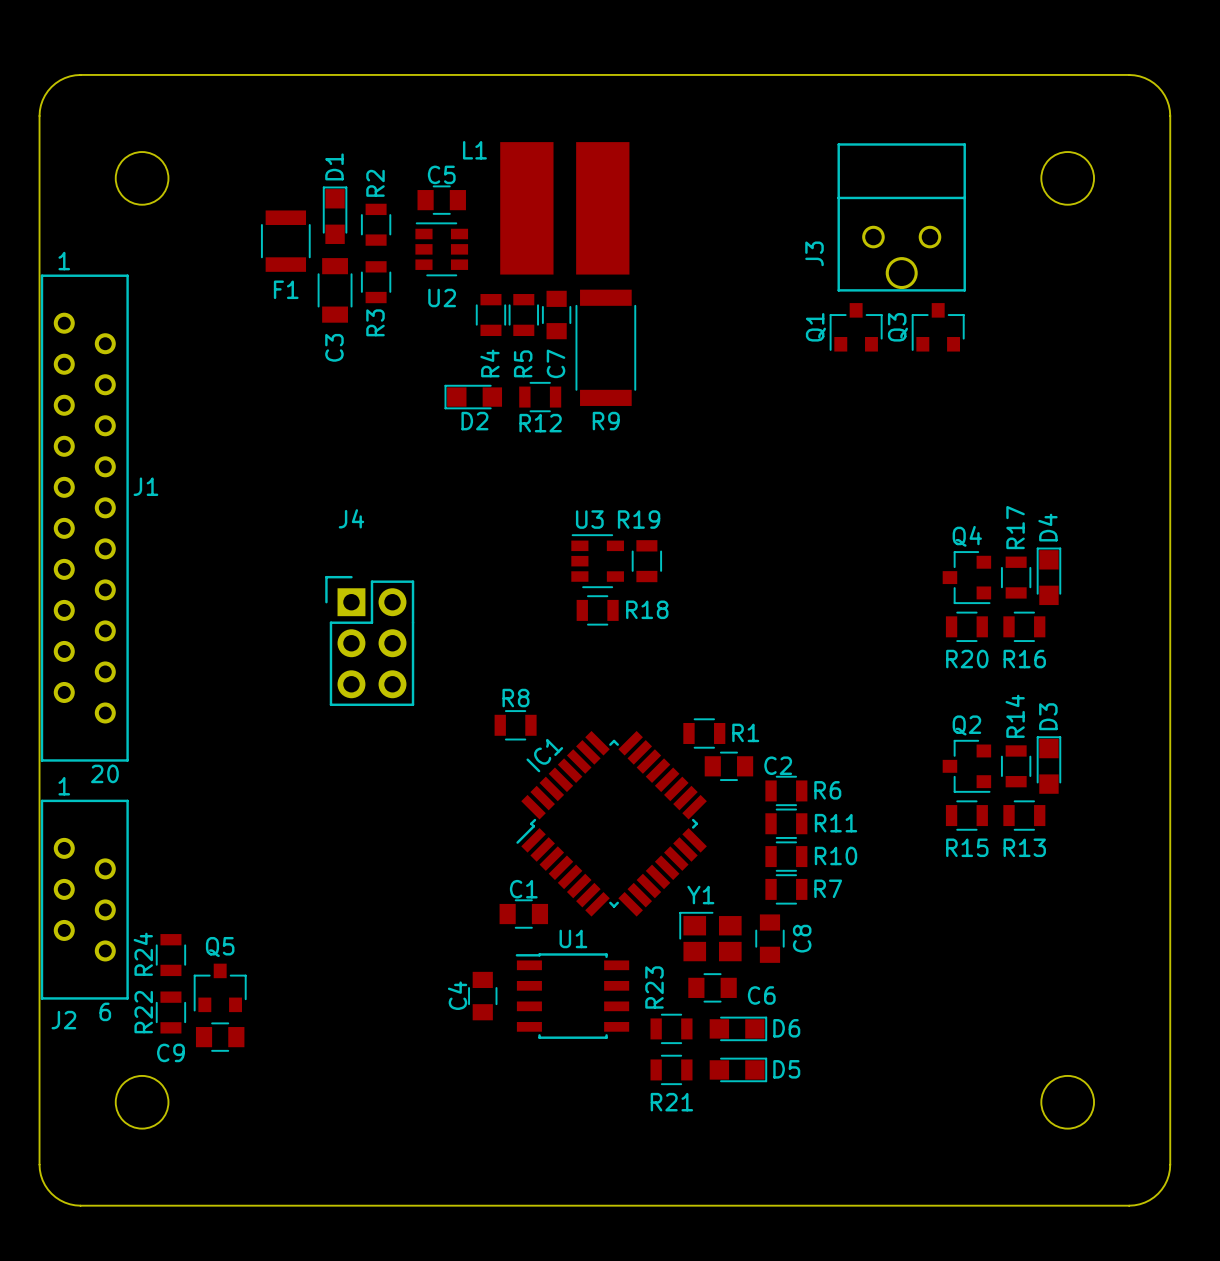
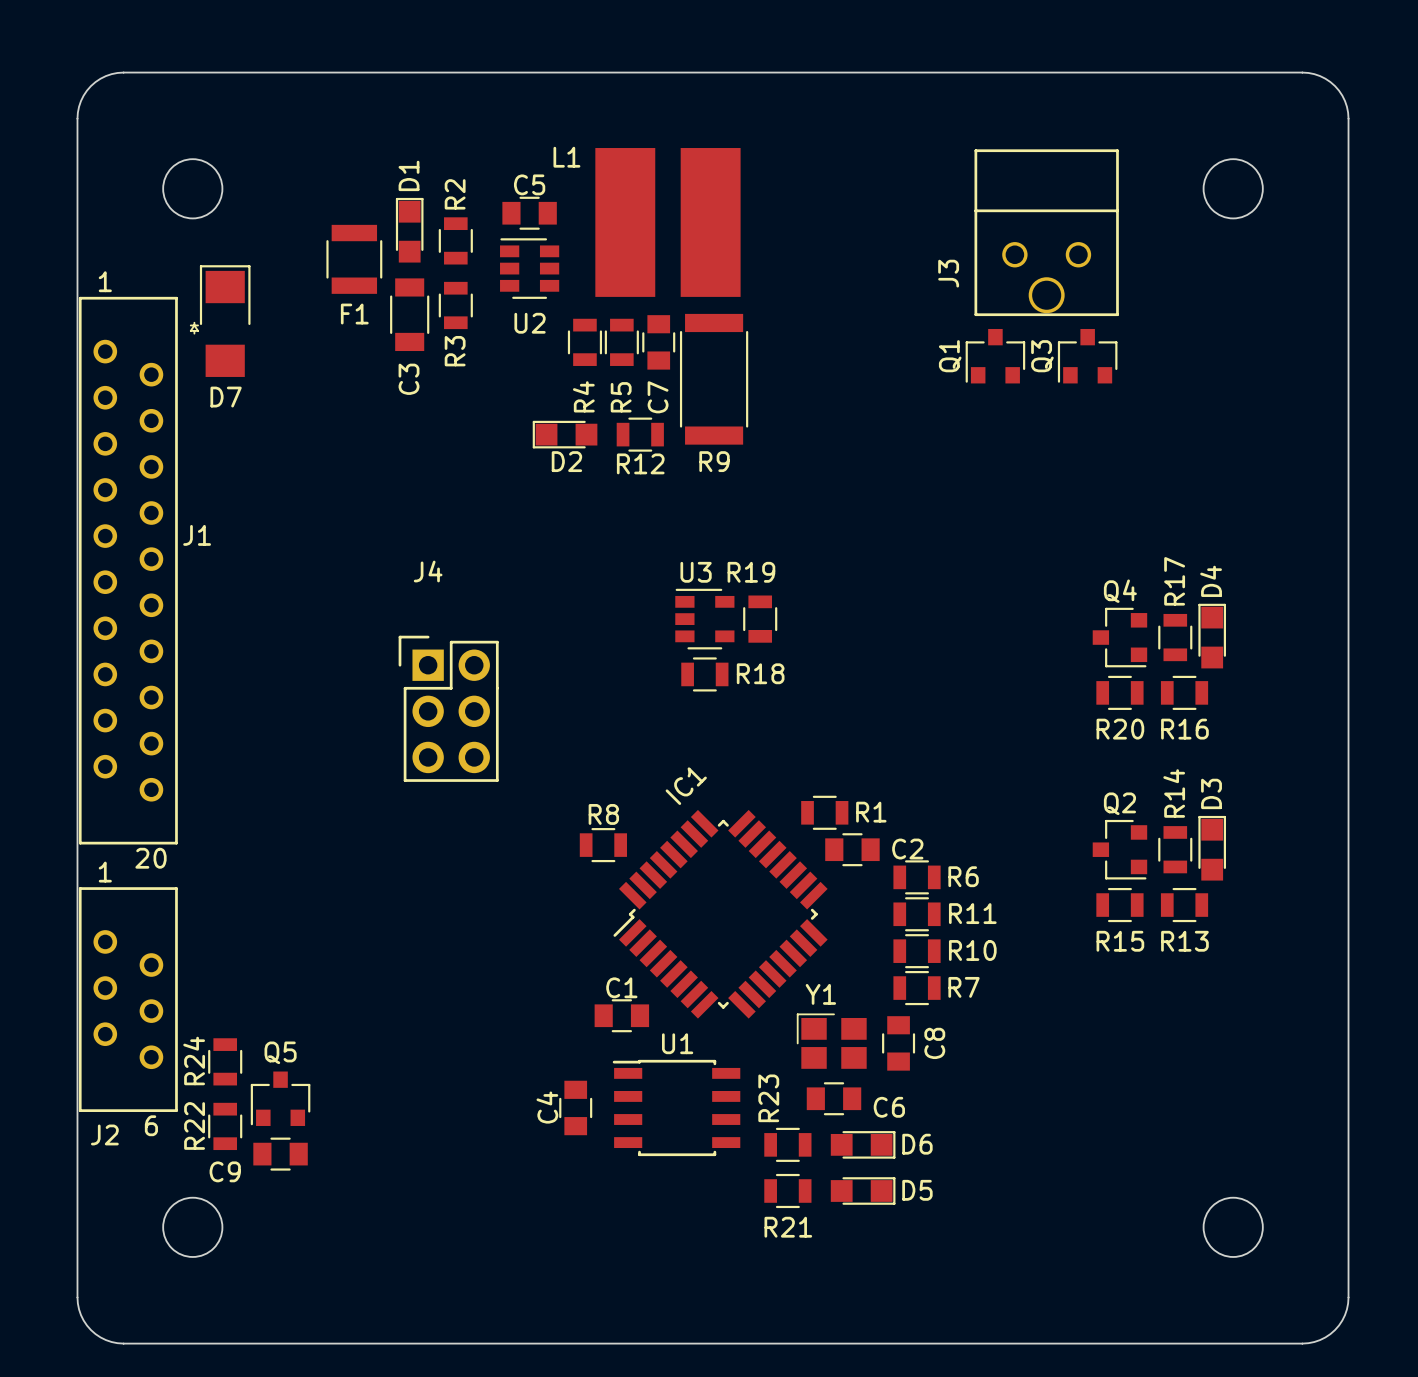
D7: none -> (220, 321)
R8 position: (515, 725) -> (603, 845)
IC1 name position: IC1 (544, 755) -> IC1 (686, 786)

